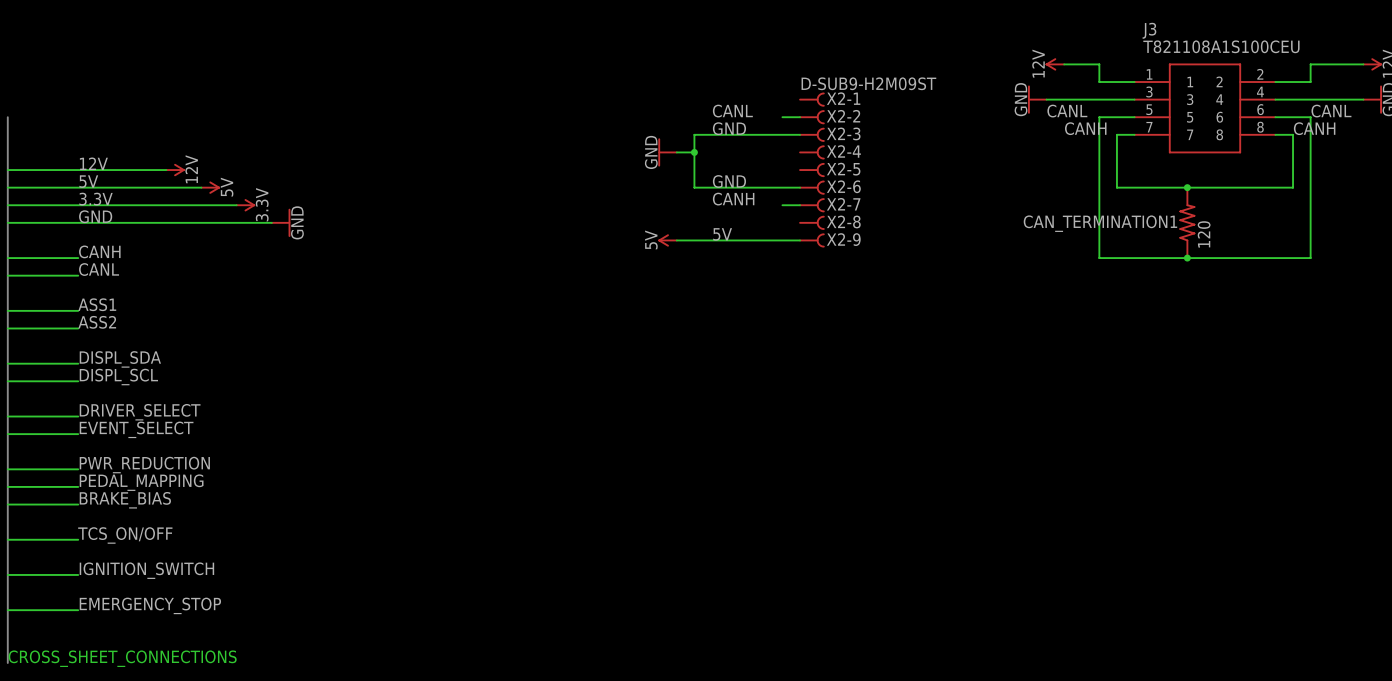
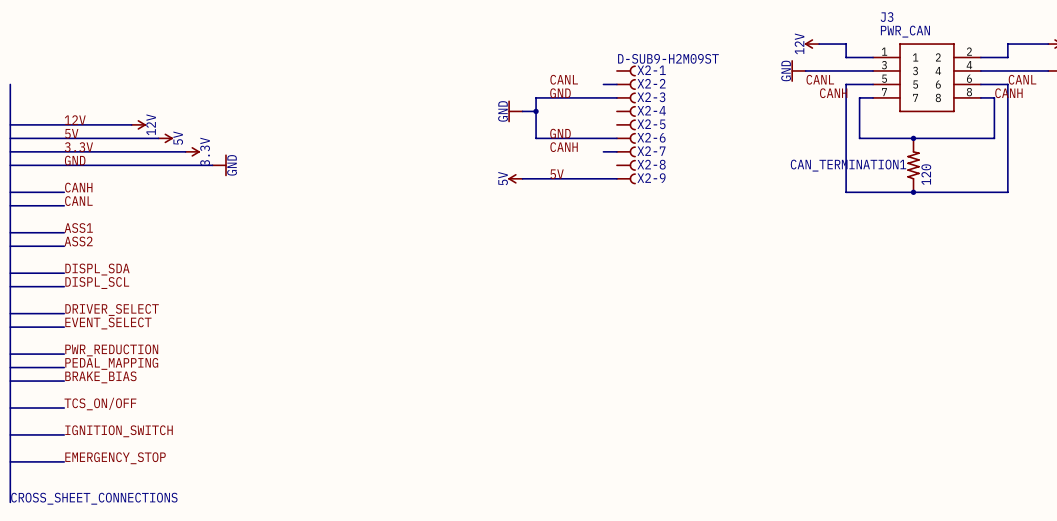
J3 value: T821108A1S100CEU (1221, 46) -> PWR_CAN (905, 31)

